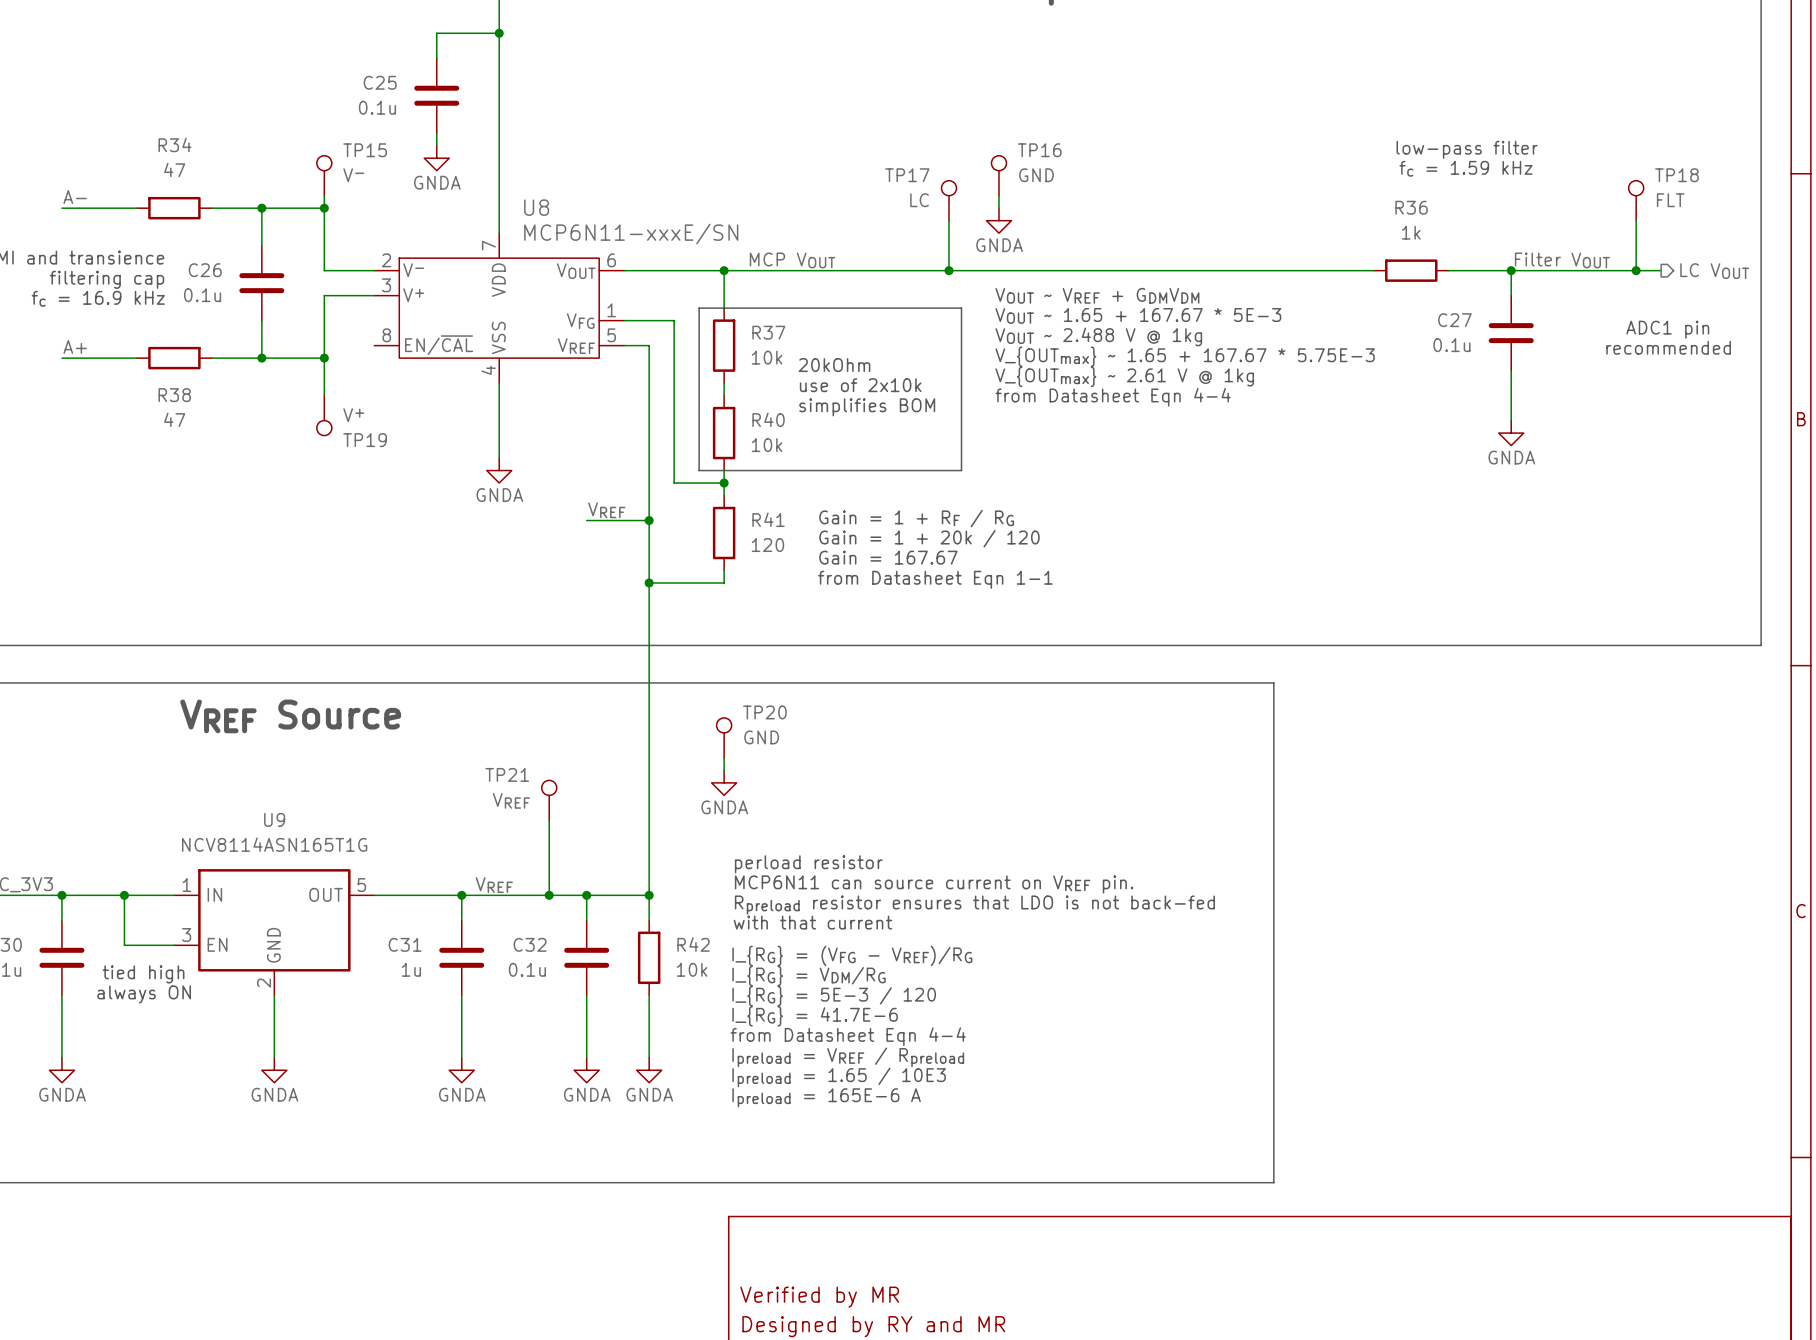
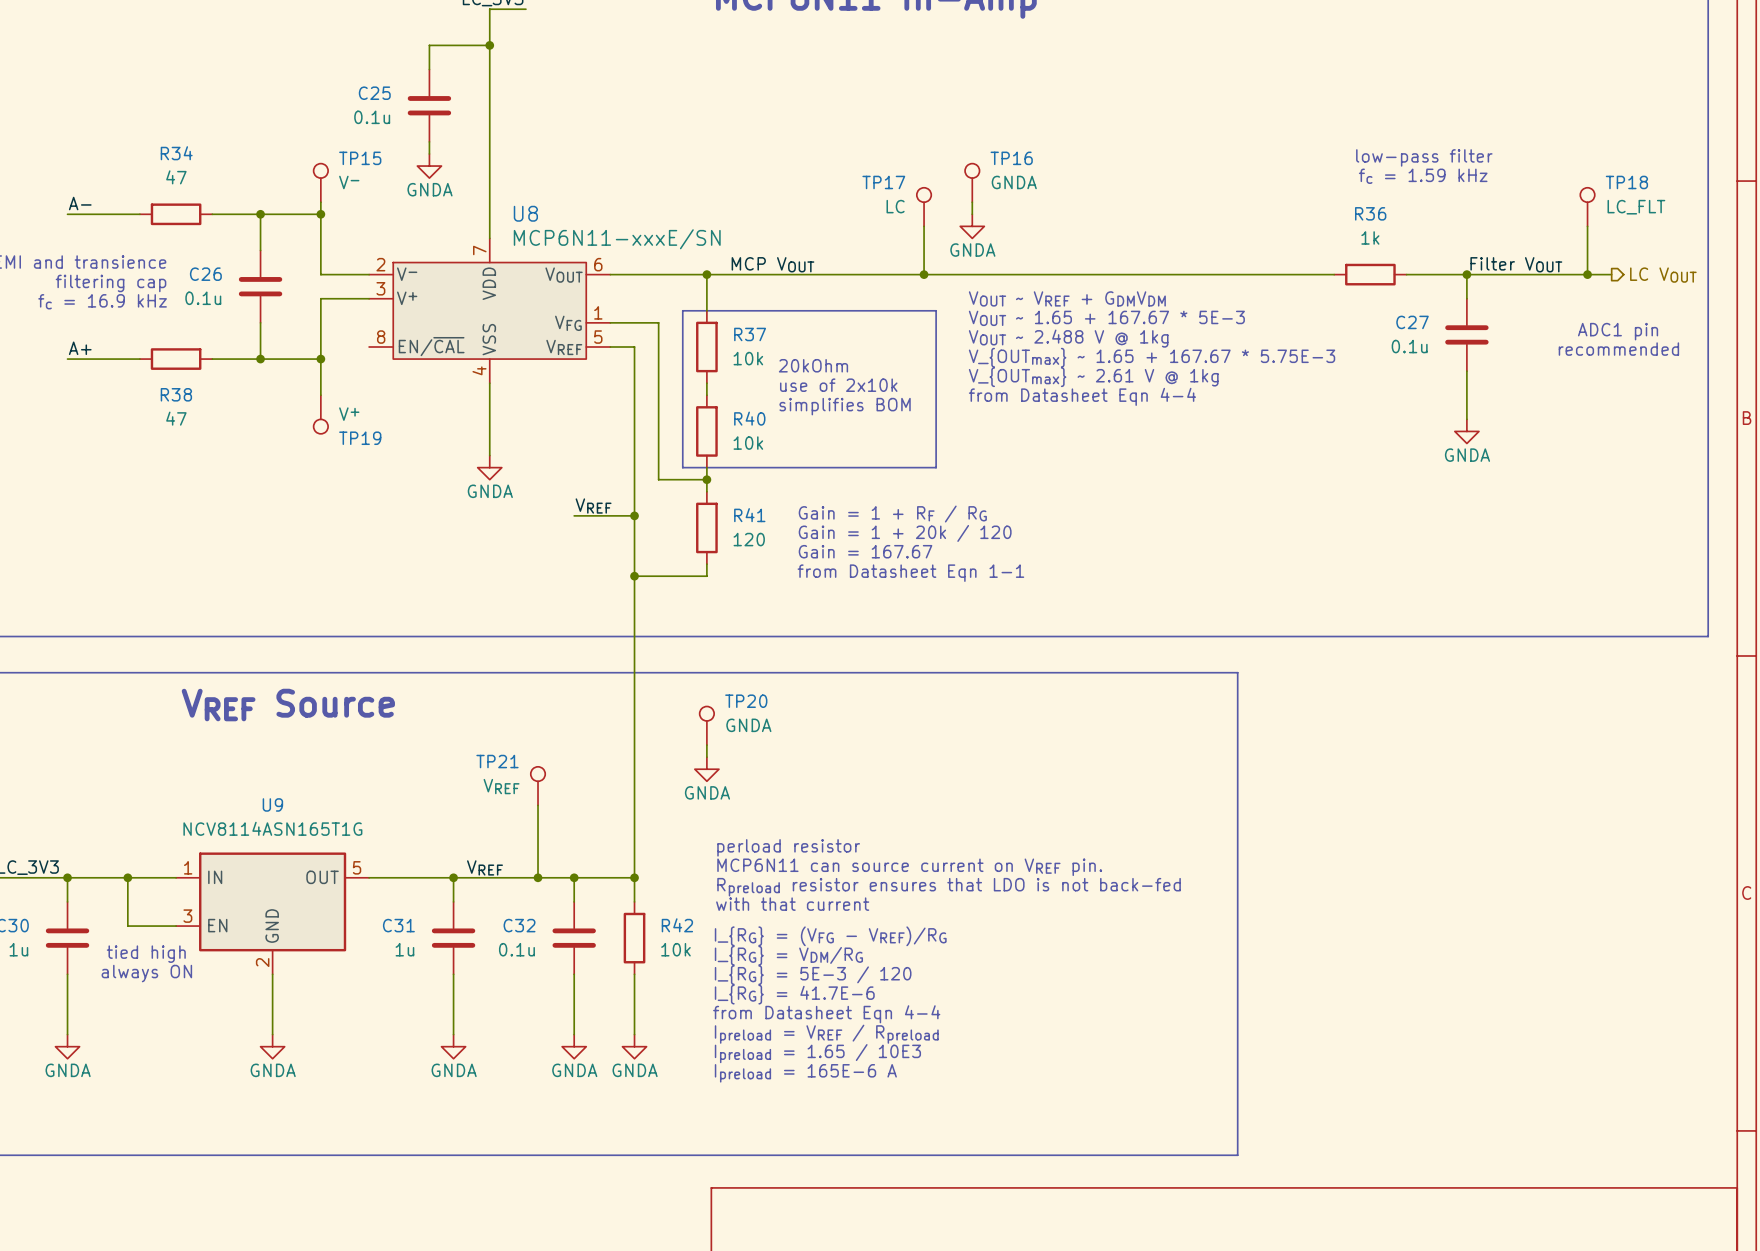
TP16 value: GND (1036, 175) -> GNDA (1014, 182)
TP18 value: FLT (1670, 200) -> LC_FLT (1636, 207)
TP20 value: GND (761, 737) -> GNDA (748, 725)

